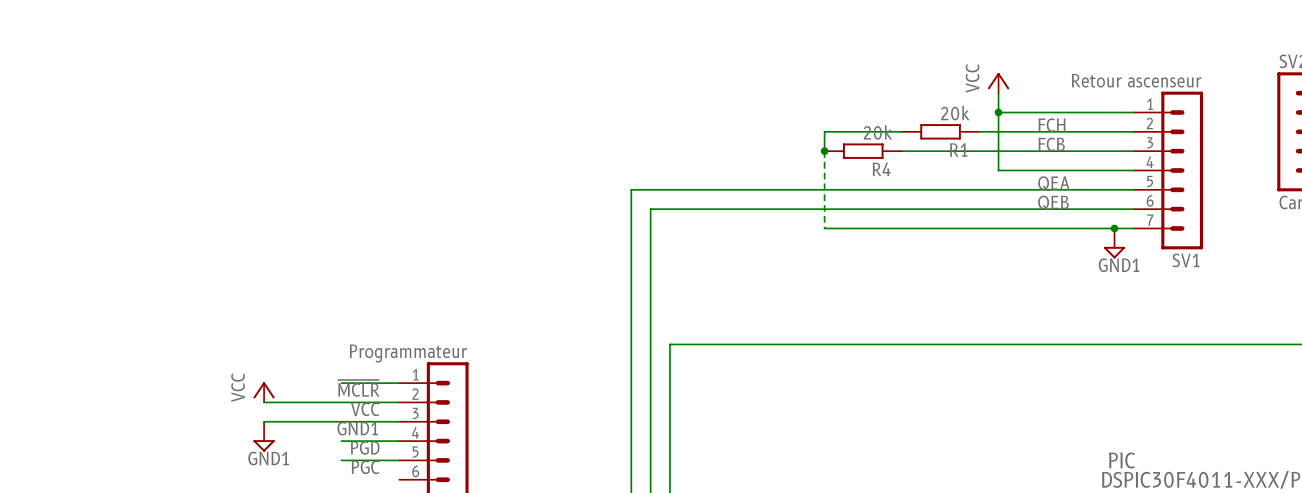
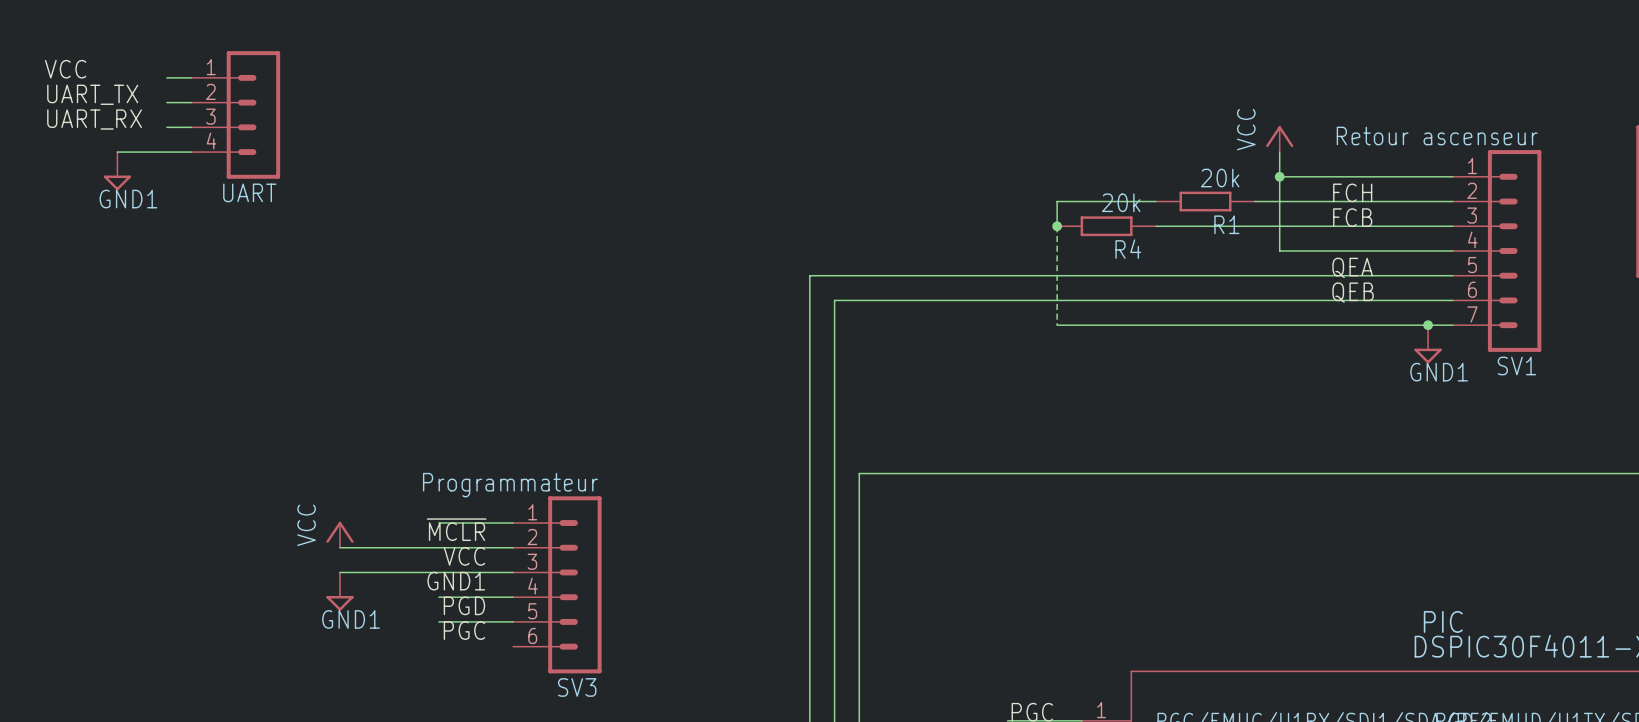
label: none -> VCC (65, 69)
wire: none -> (166, 77) (191, 77)
label: none -> UART_TX (92, 94)
wire: none -> (166, 102) (191, 102)
UART: none -> (235, 114)
label: none -> UART_RX (94, 119)
wire: none -> (166, 127) (191, 127)
wire: none -> (117, 152) (191, 152)
power symbol: none -> GND1 (117, 171)

